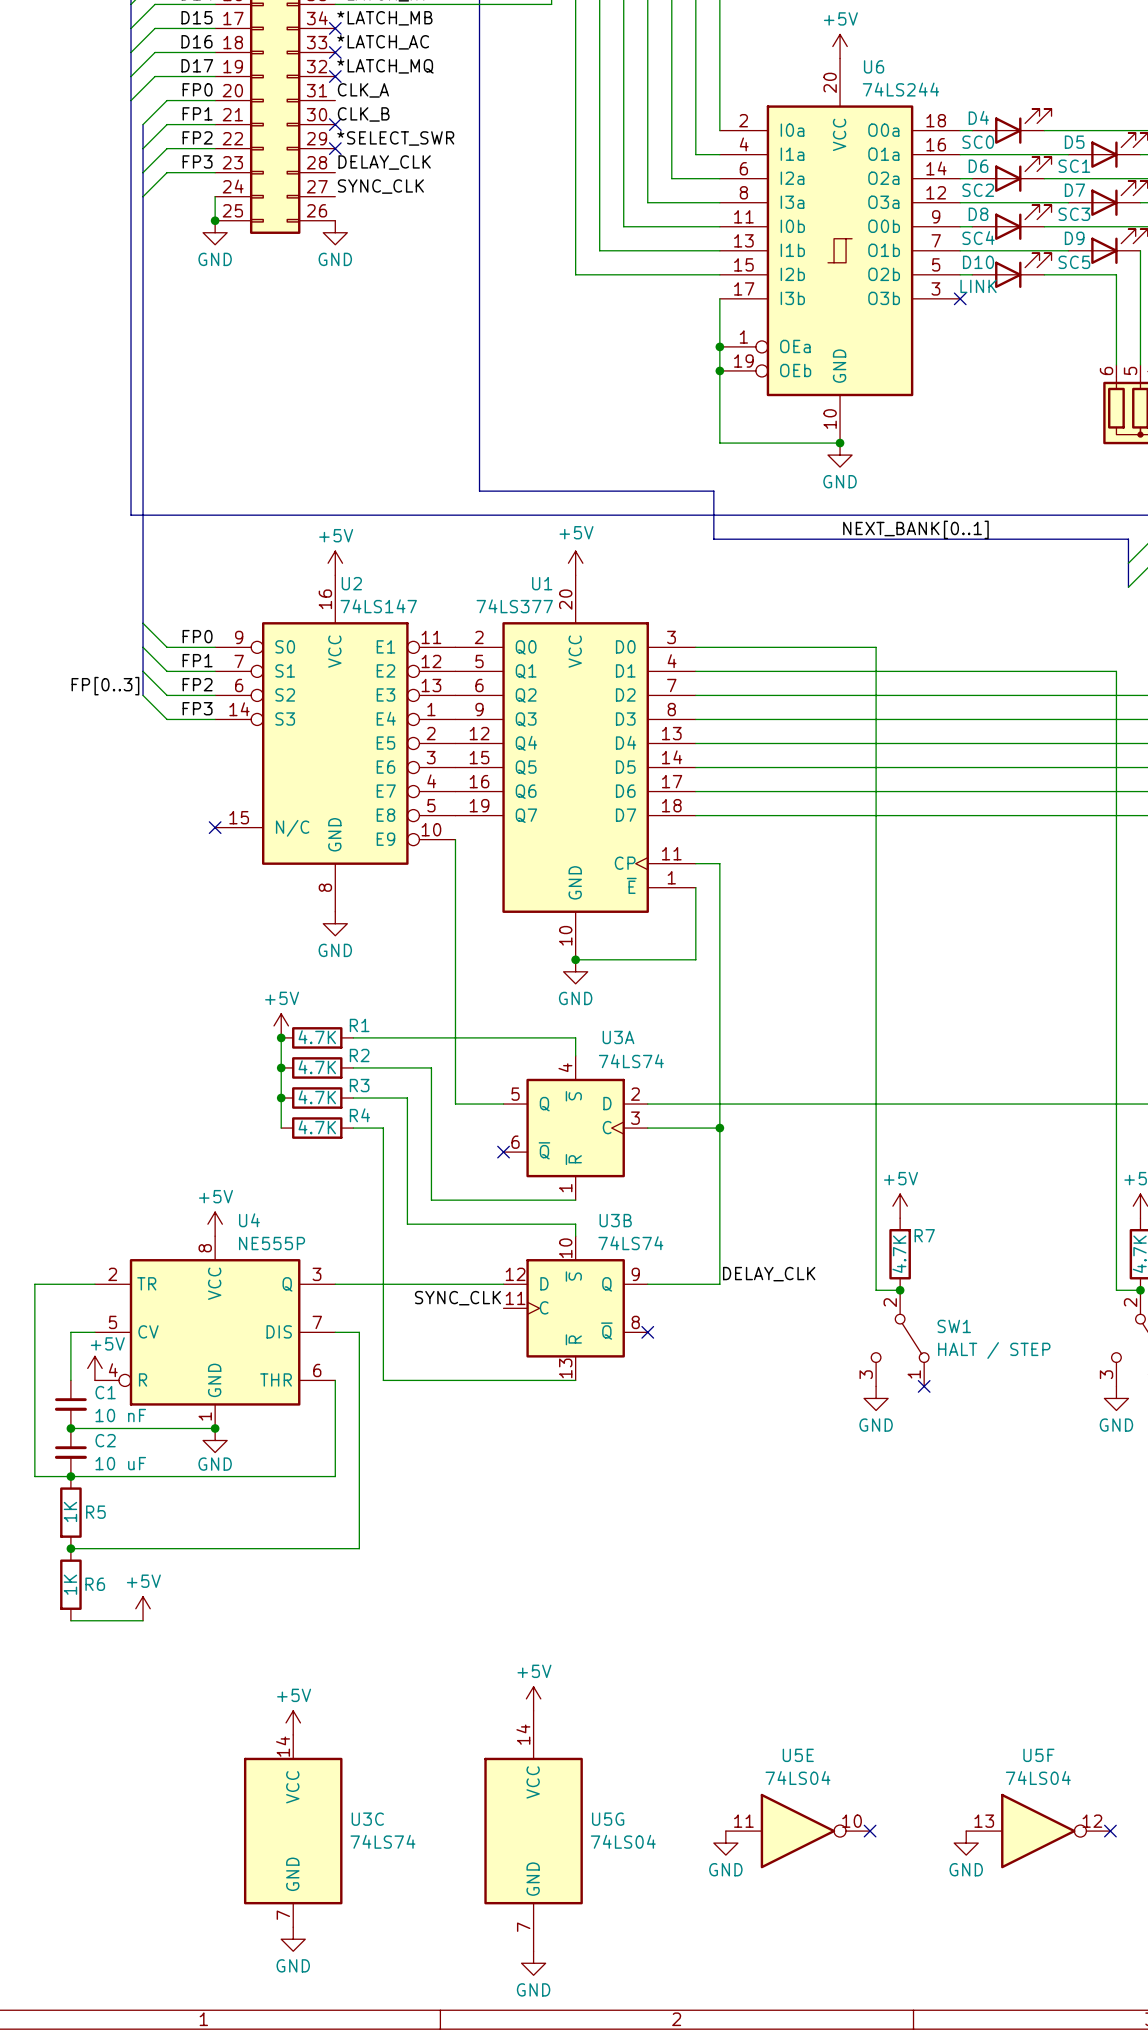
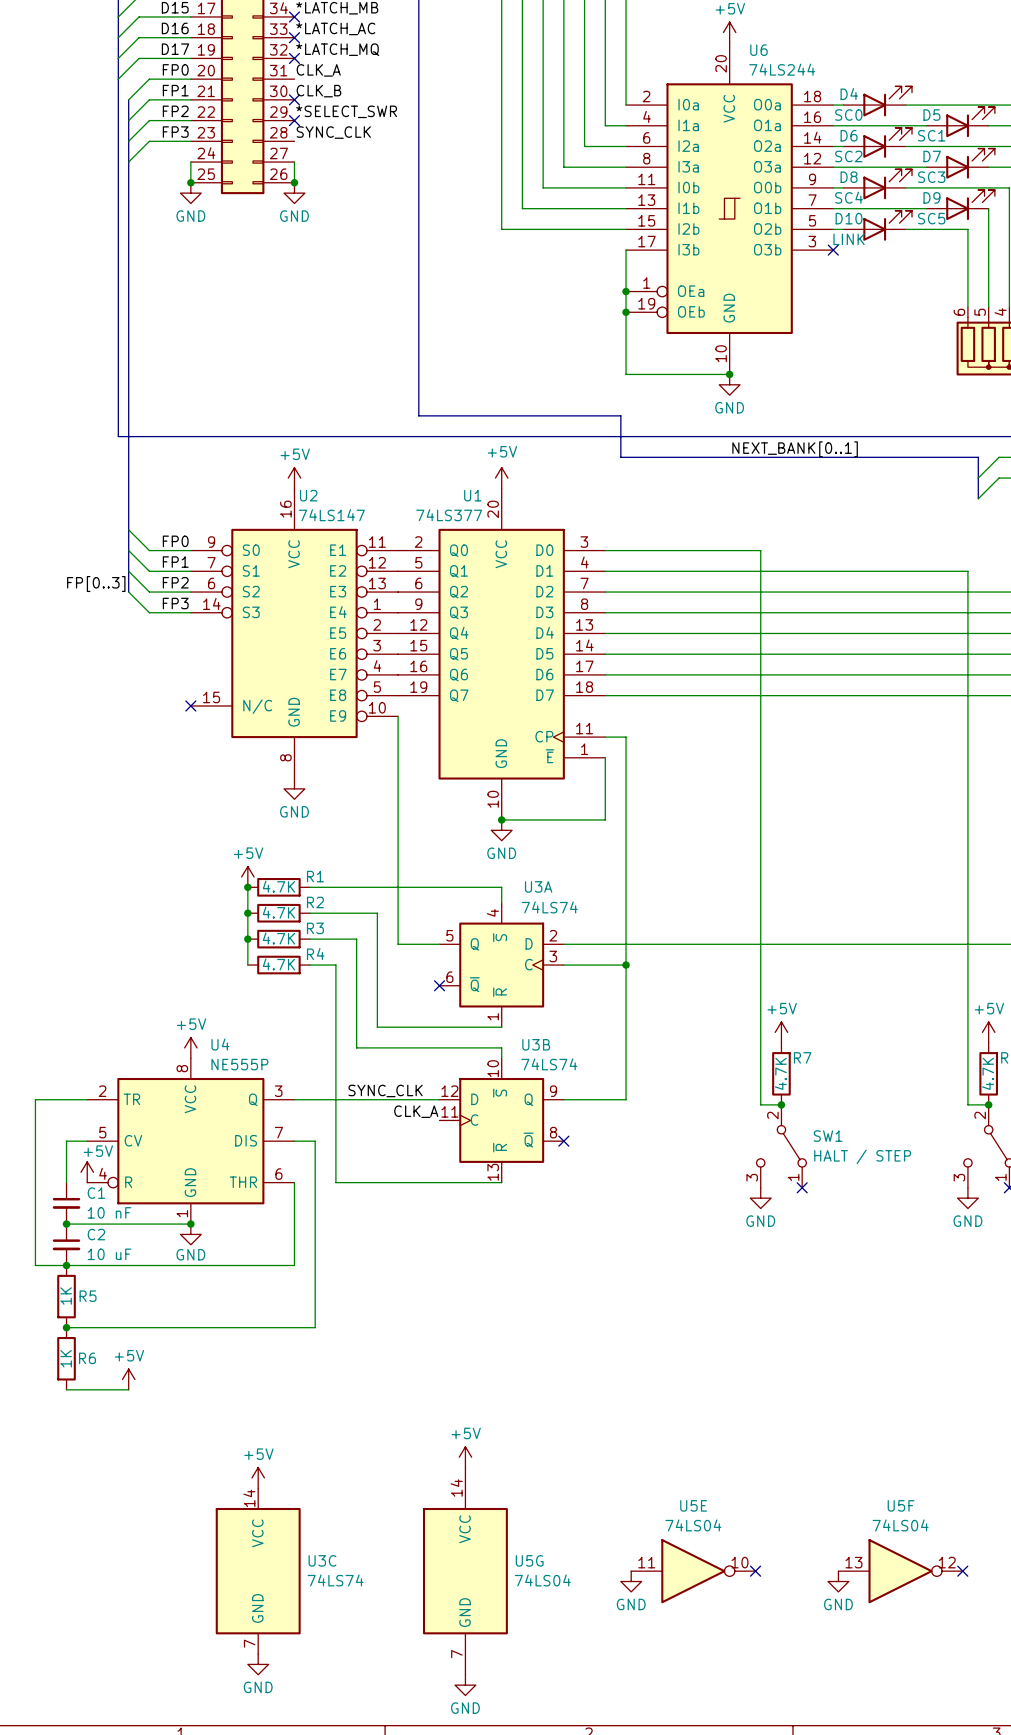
label: DELAY_CLK (384, 162) -> SYNC_CLK (333, 132)
label: SYNC_CLK (380, 186) -> none
wire: none -> (294, 162) (294, 182)
junction: none -> (294, 182)
label: none -> SYNC_CLK (385, 1090)
label: DELAY_CLK (769, 1274) -> none
label: SYNC_CLK (457, 1298) -> CLK_A (416, 1111)

